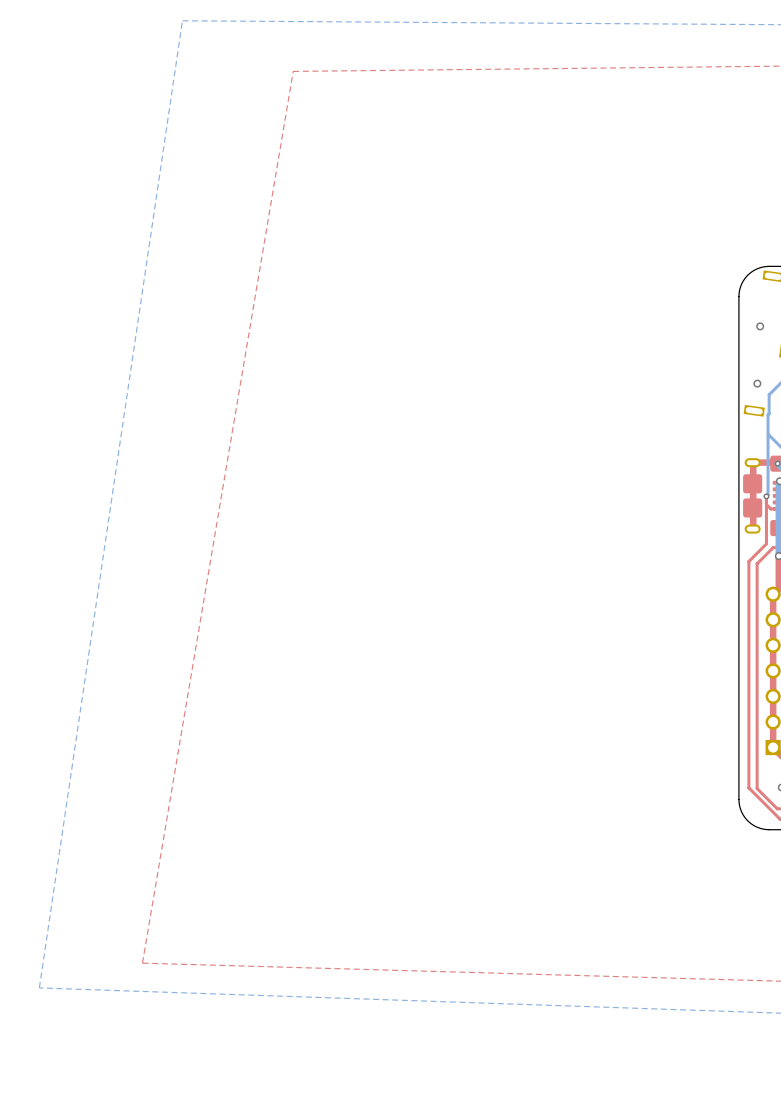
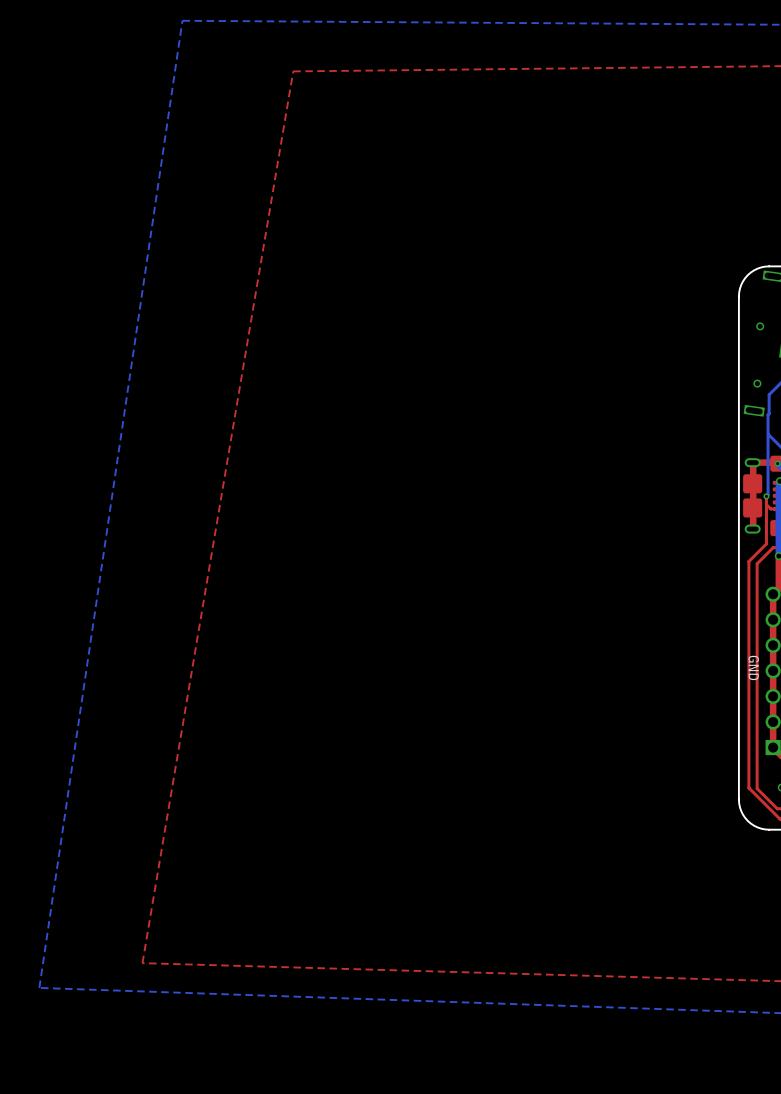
text: none -> GND (753, 667)

